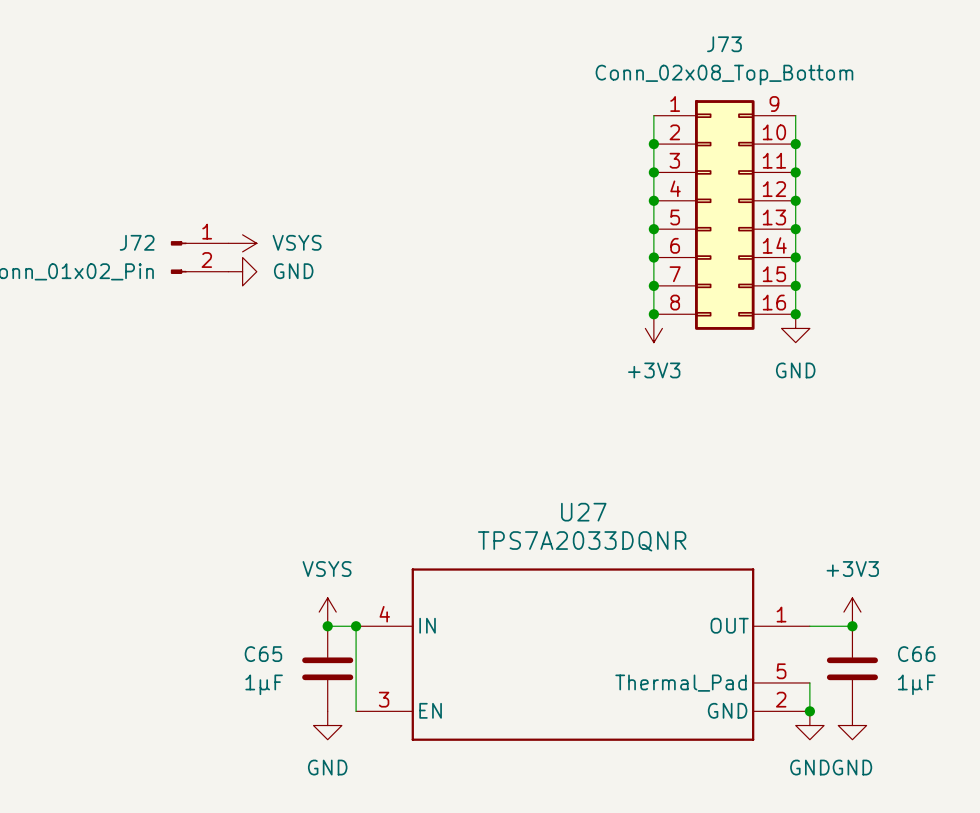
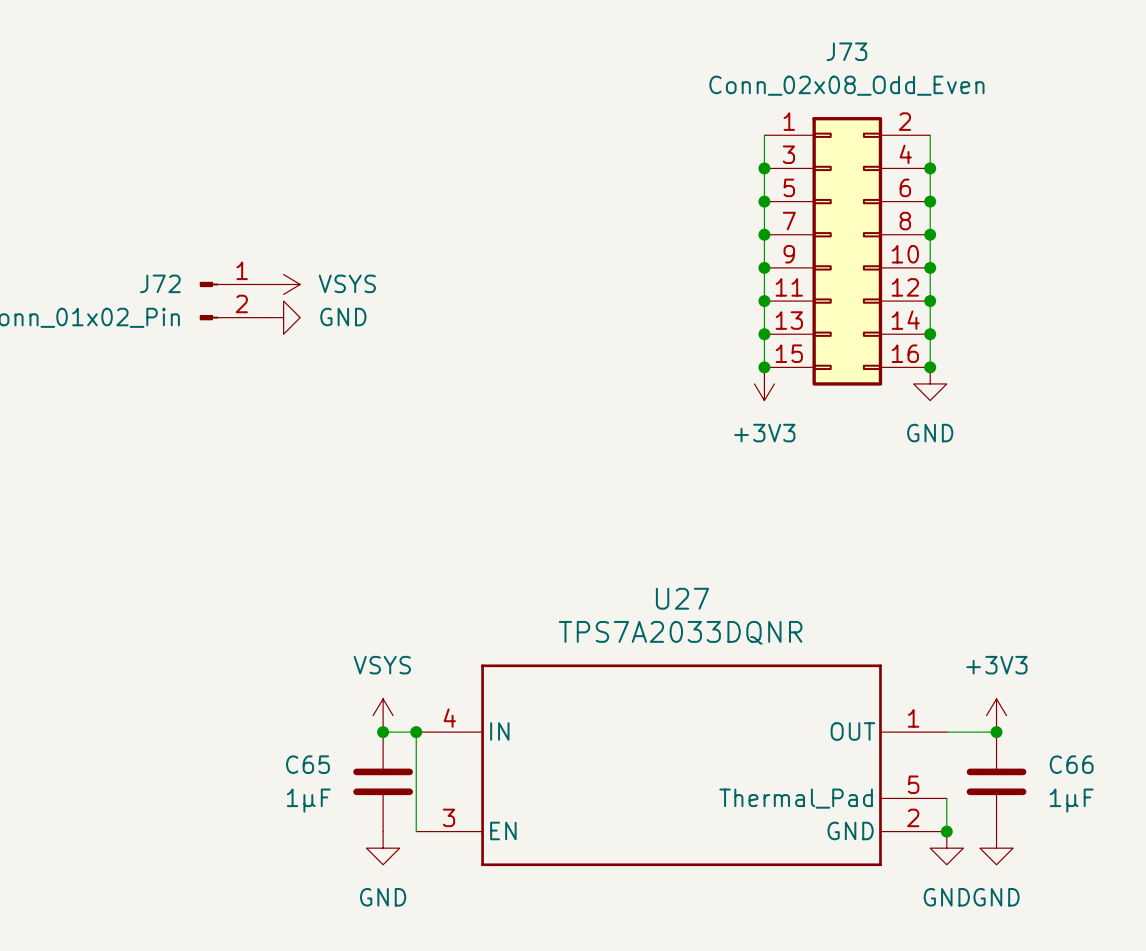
J73 value: Conn_02x08_Top_Bottom (724, 74) -> Conn_02x08_Odd_Even (846, 85)
J73 symbol: [653, 100, 796, 330] -> [764, 117, 931, 386]

